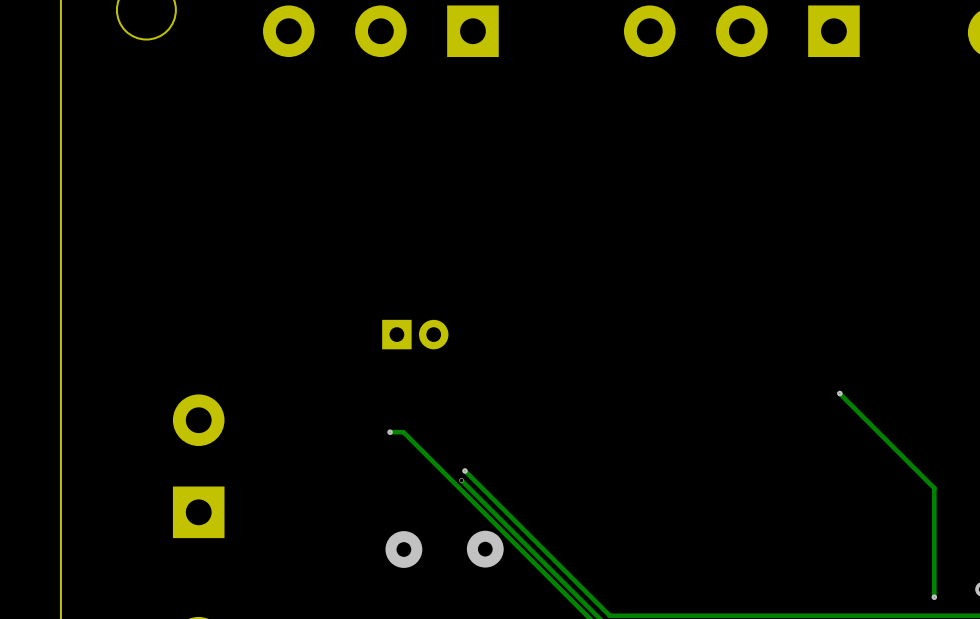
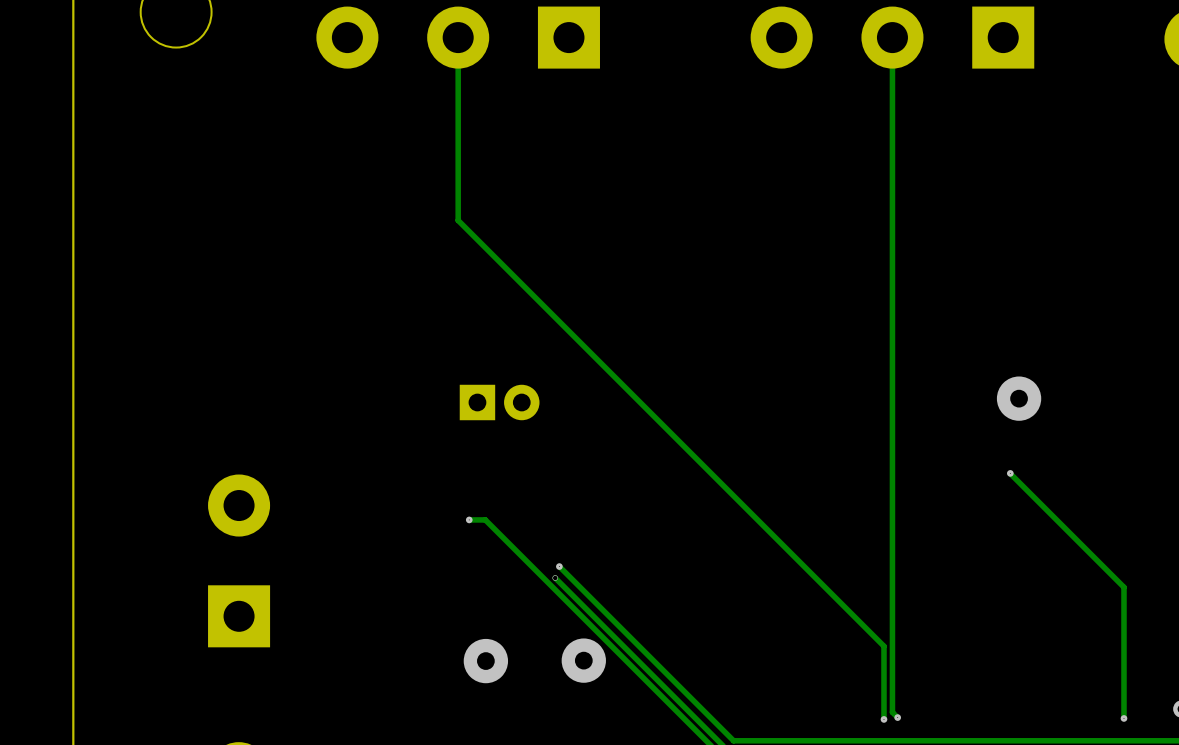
track: none -> (458, 37) (458, 220) (883, 646) (883, 719)
track: none -> (892, 37) (892, 712) (897, 717)
via: none -> (1019, 398)
via: none -> (897, 717)
via: none -> (883, 719)

